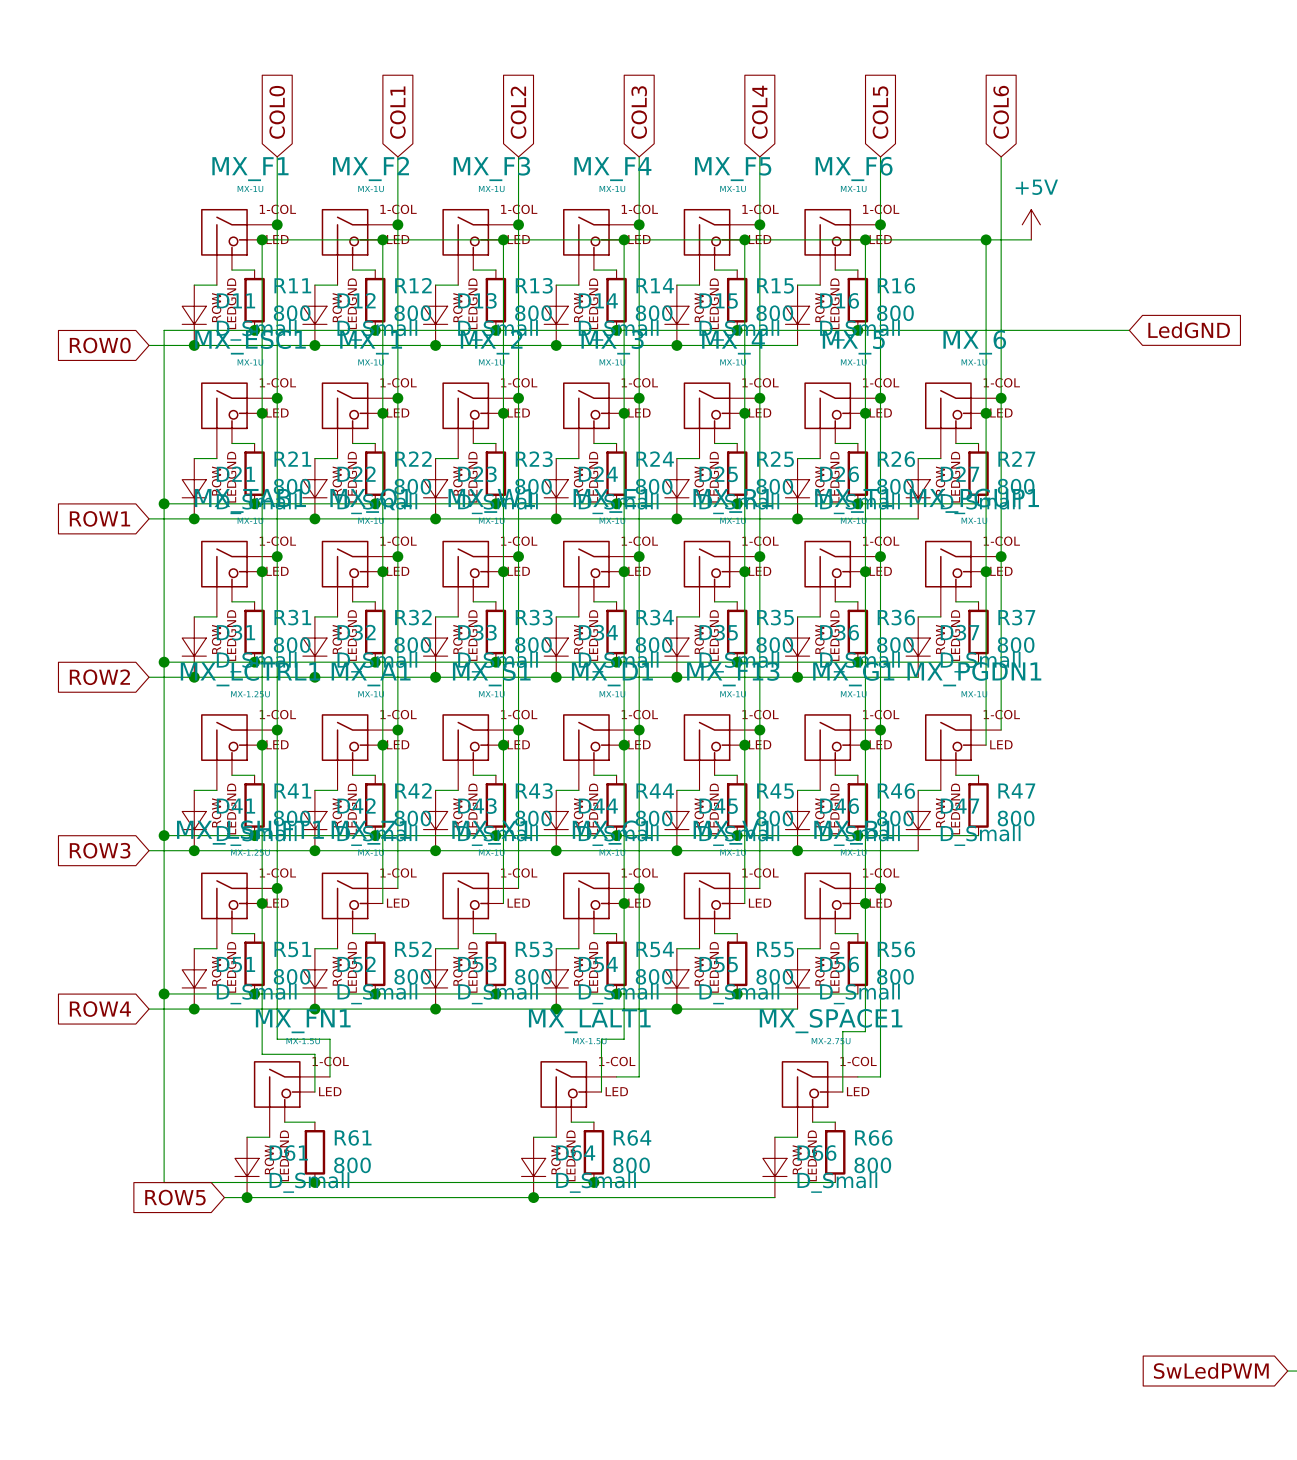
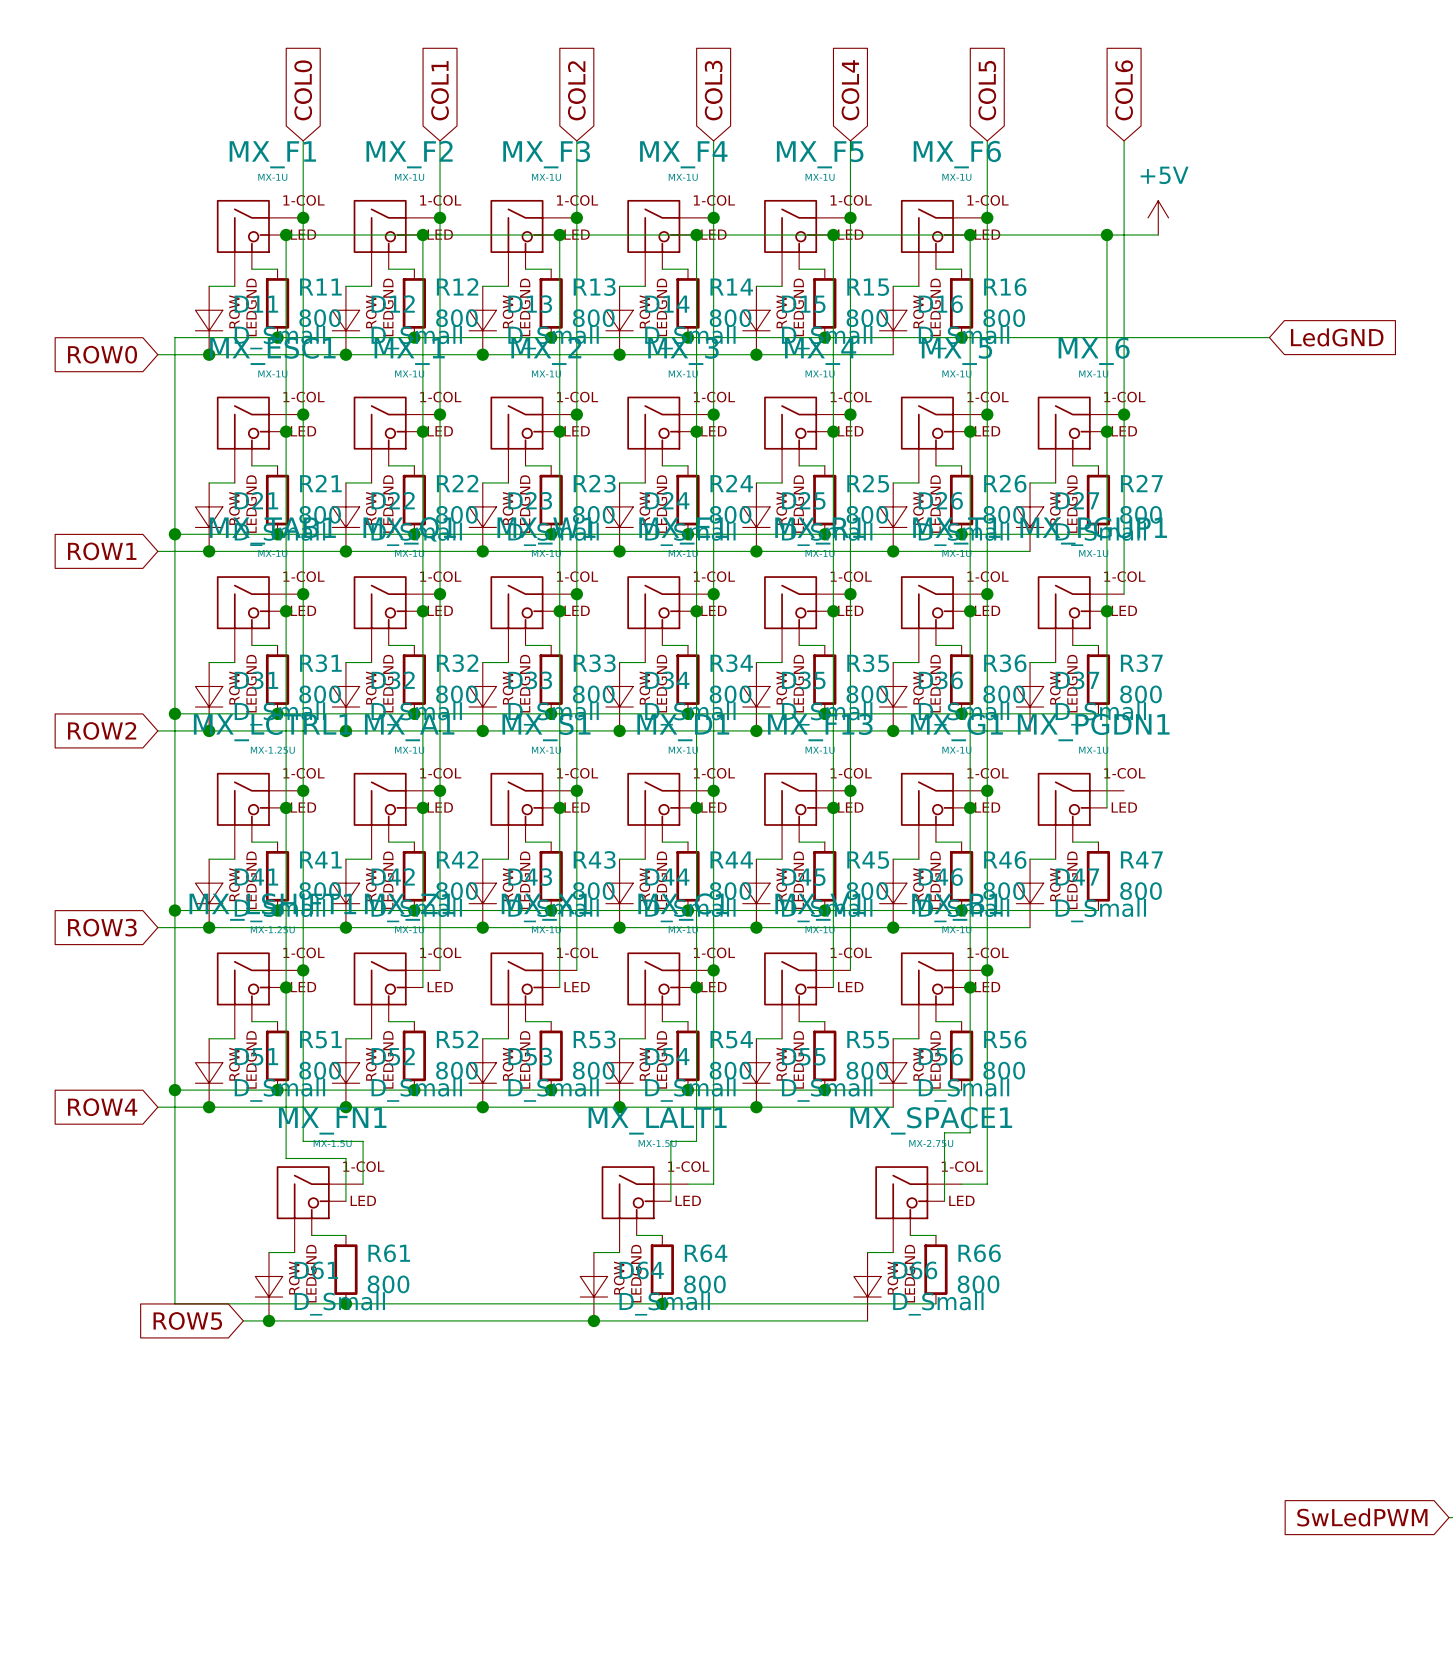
wire: (1001, 556) (1001, 730) -> none
junction: (1001, 556) -> none

